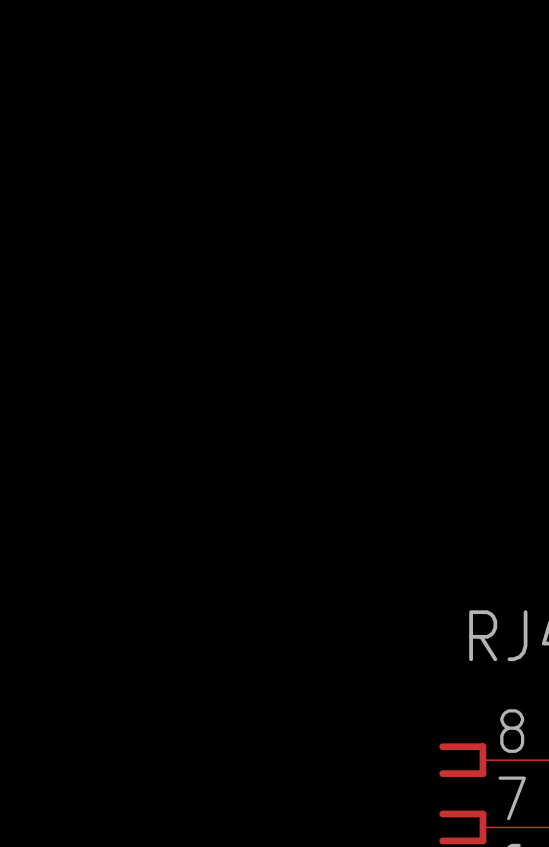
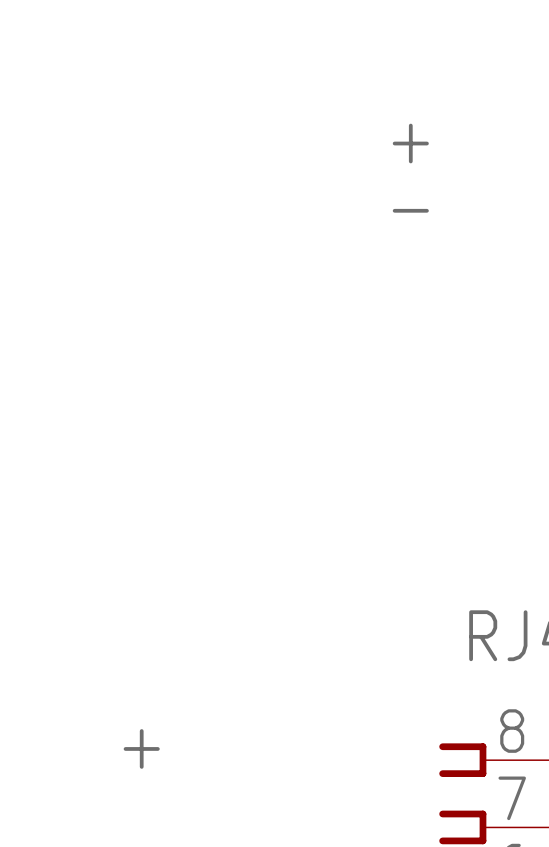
text: none -> + (410, 143)
text: none -> - (410, 210)
text: none -> + (141, 748)

